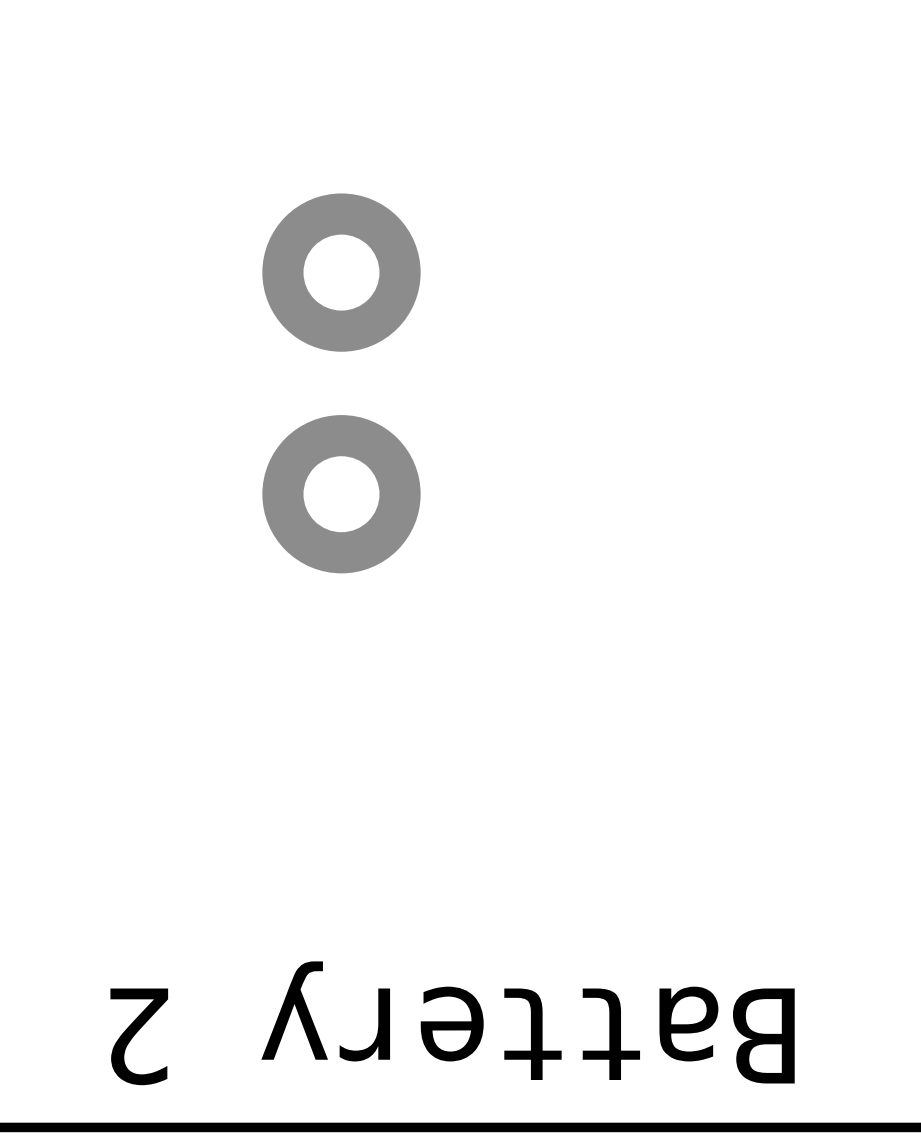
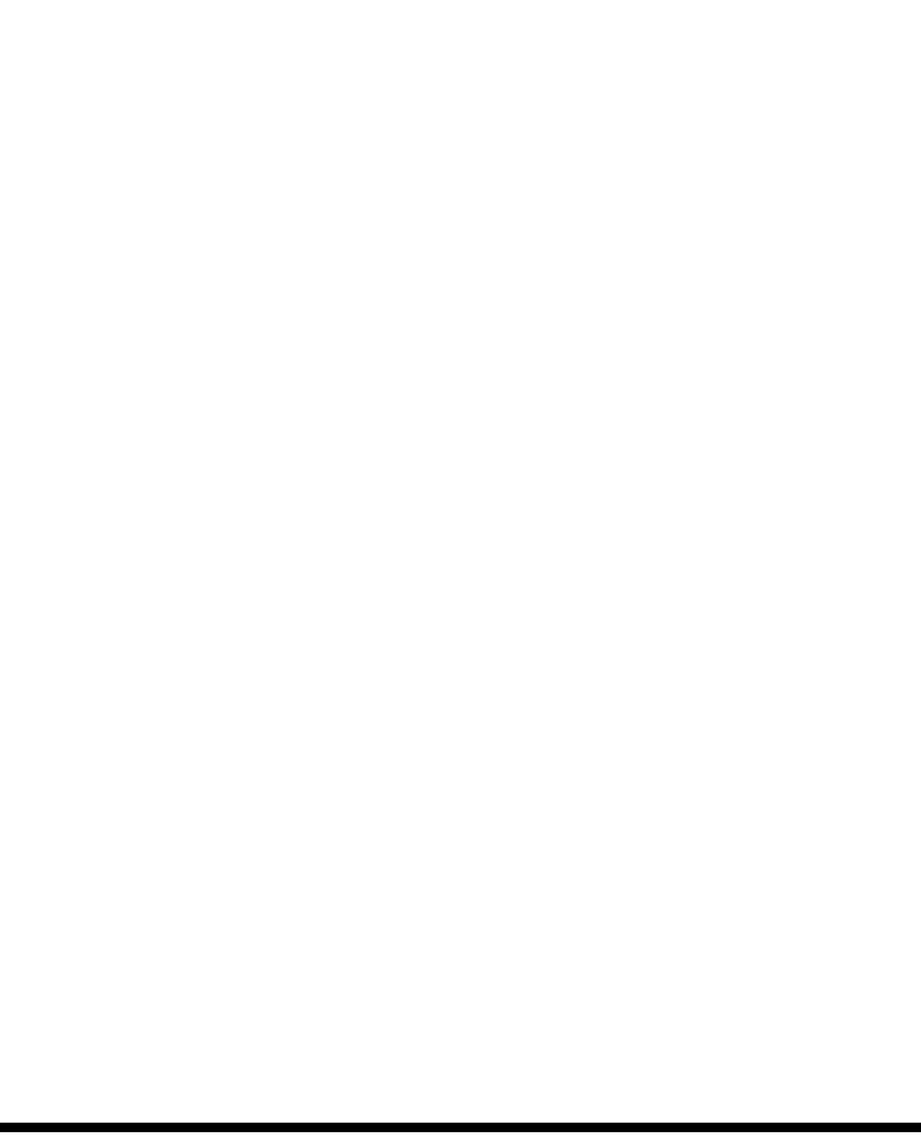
part: (341, 272) -> none
part: (341, 494) -> none
text: Battery 2 (452, 1023) -> none

